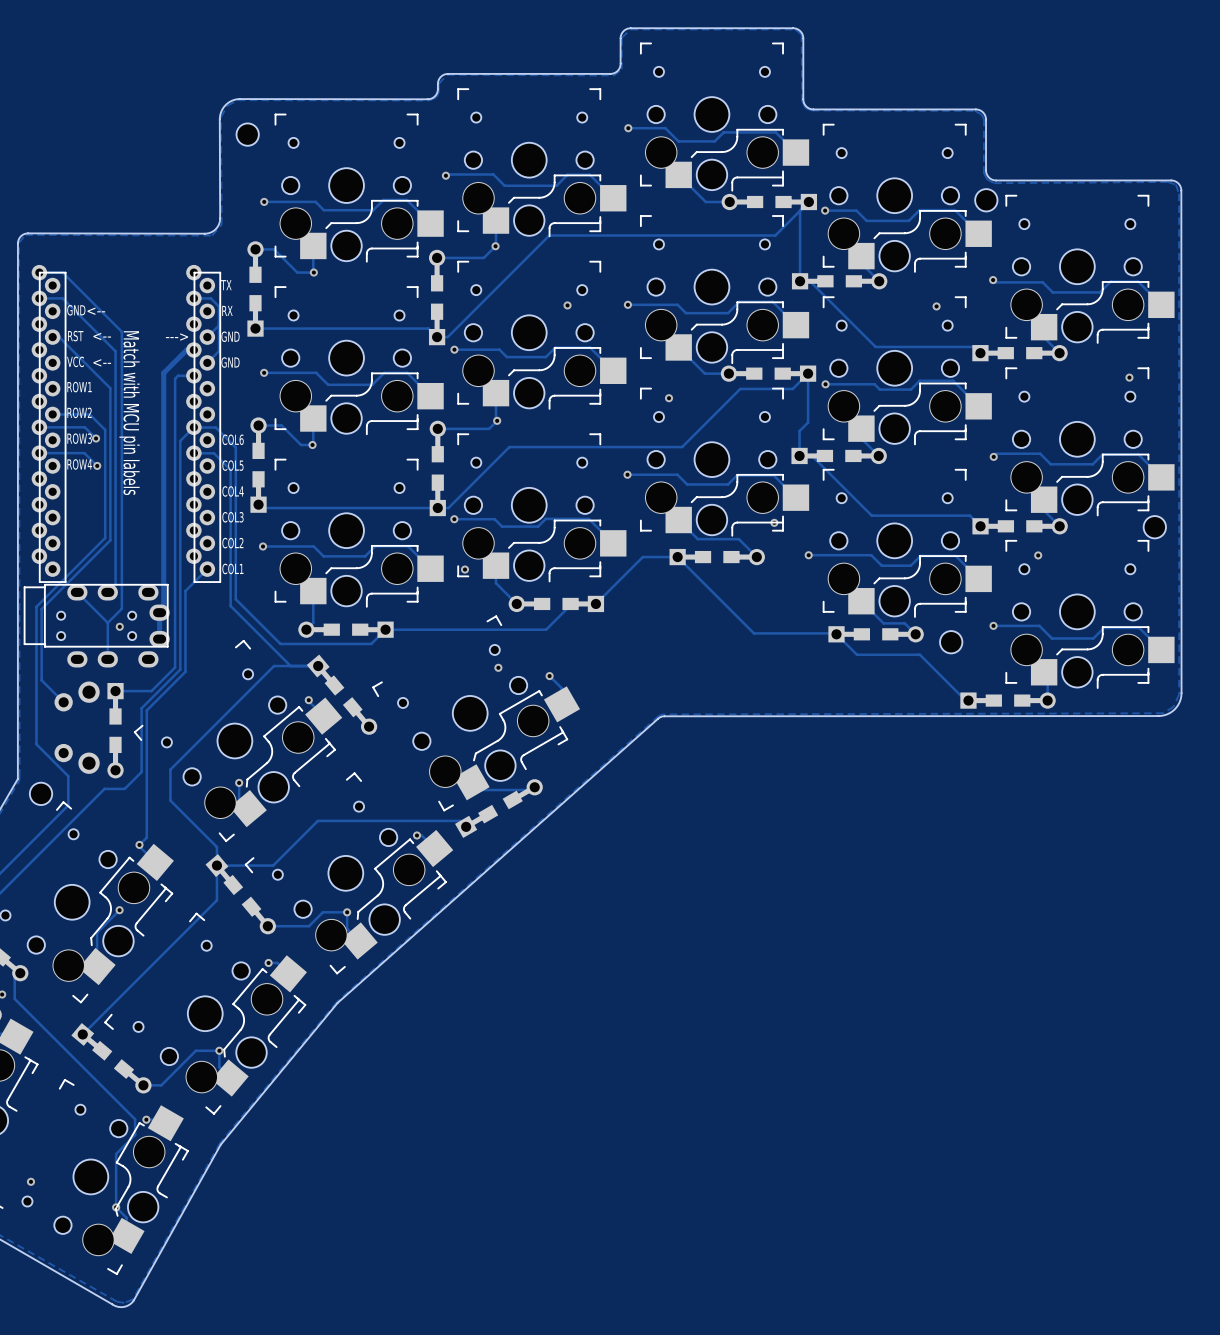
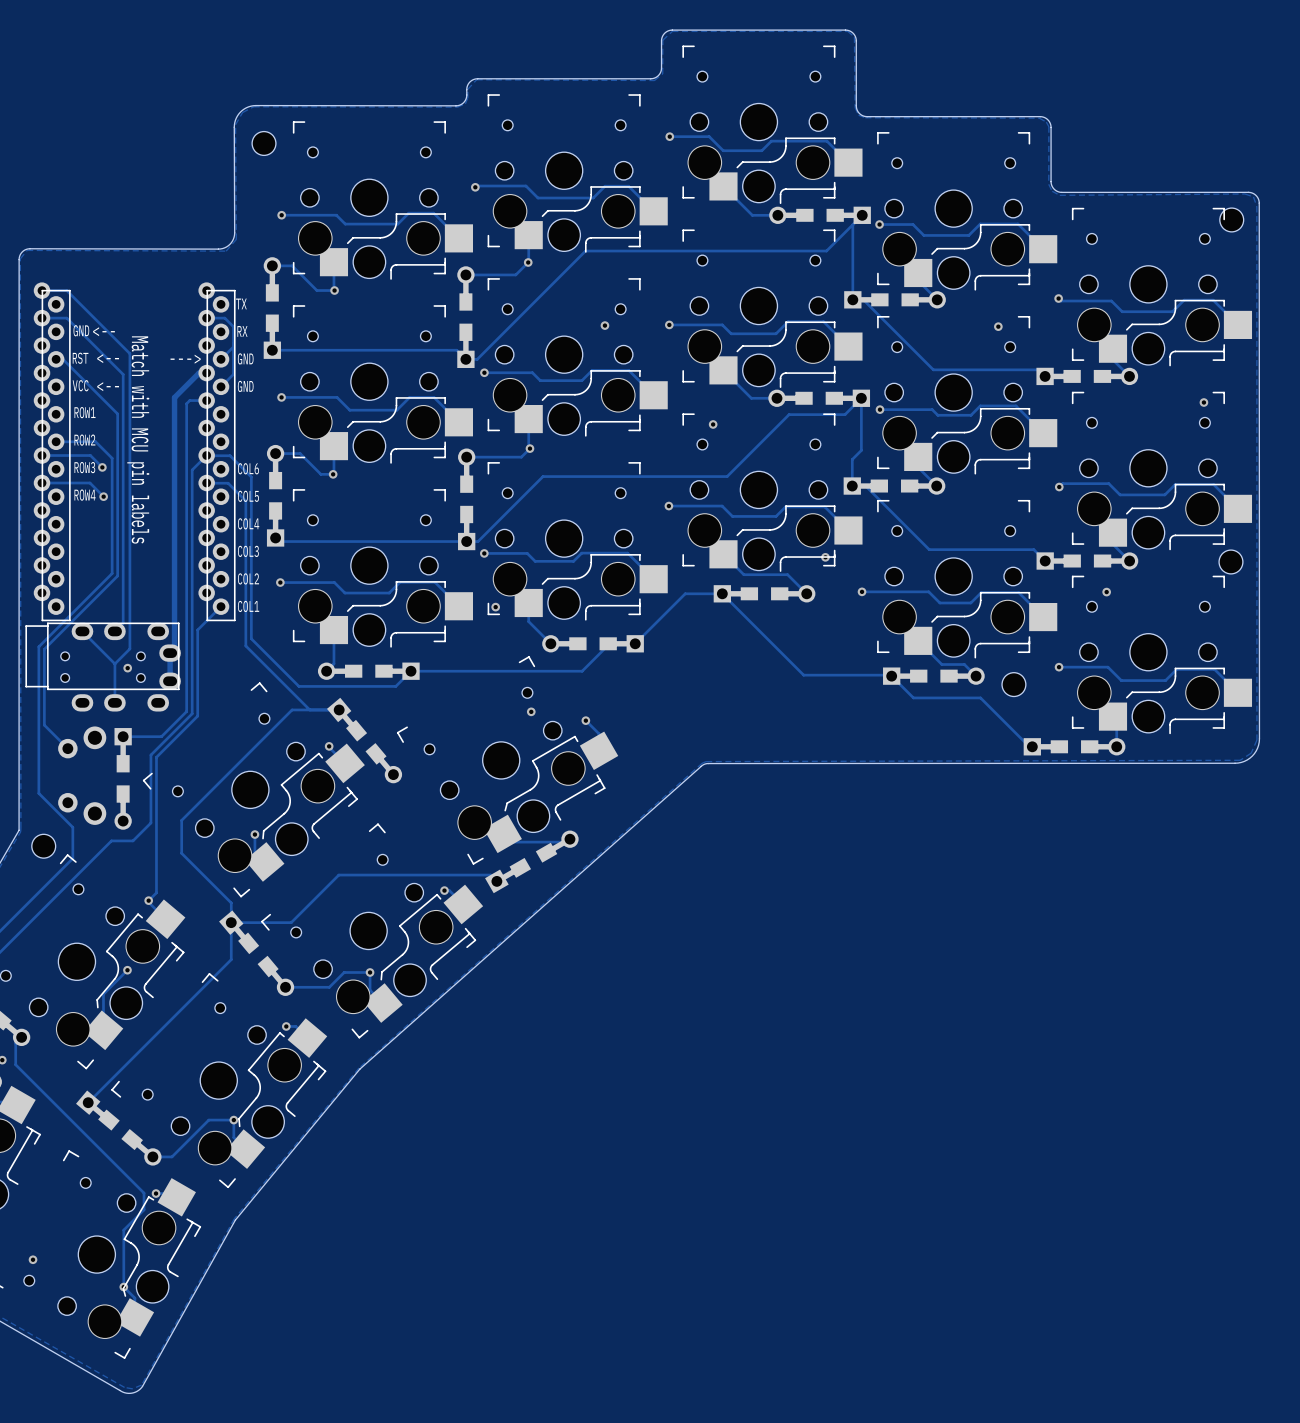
part position: (986, 200) -> (1231, 219)

